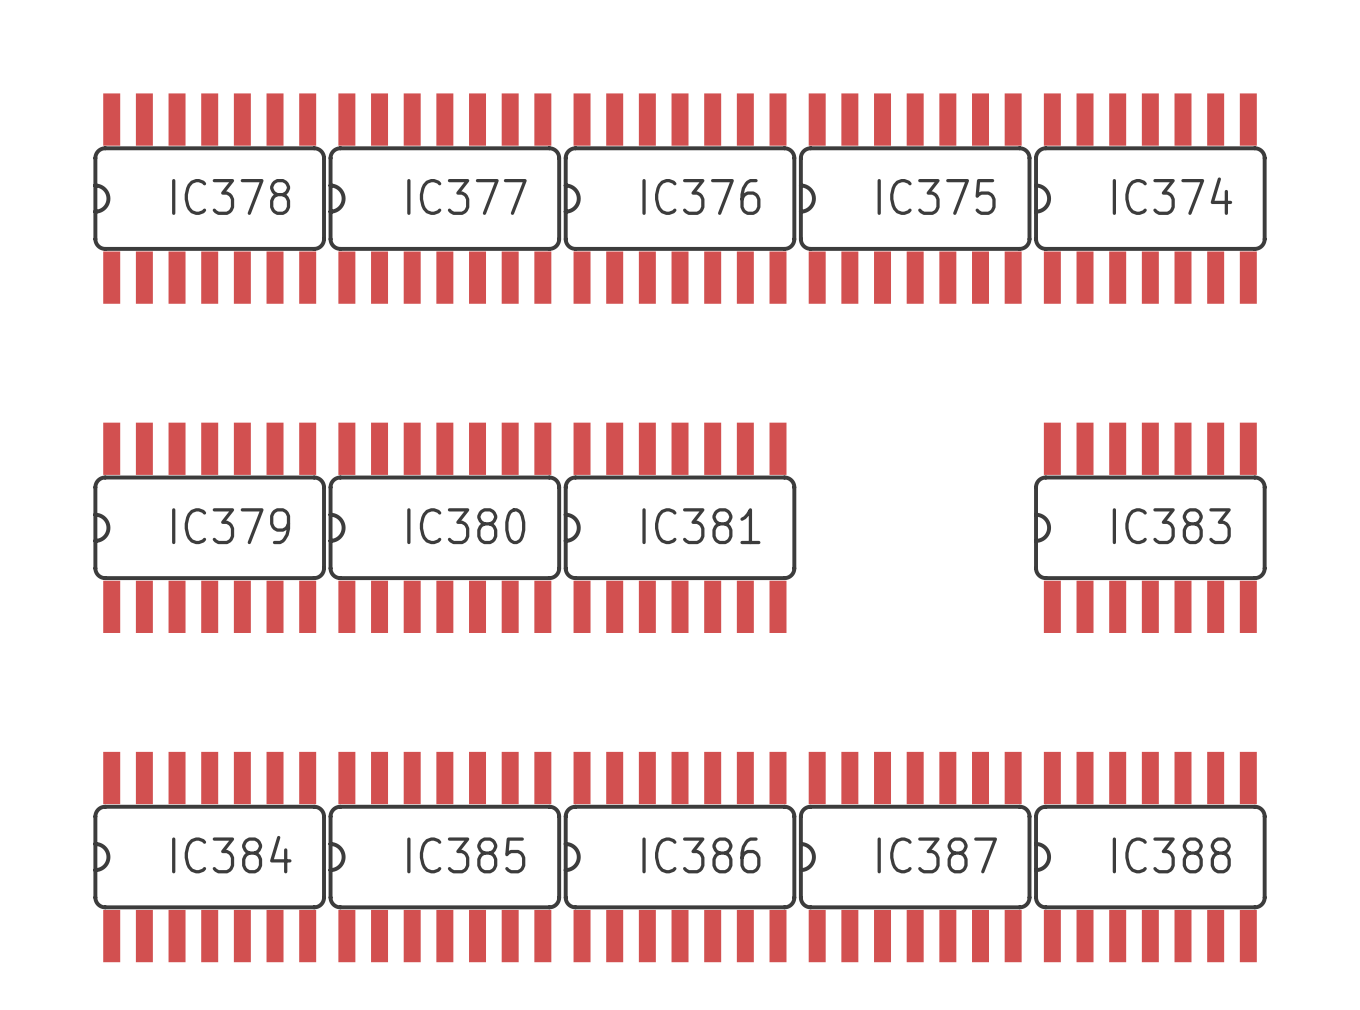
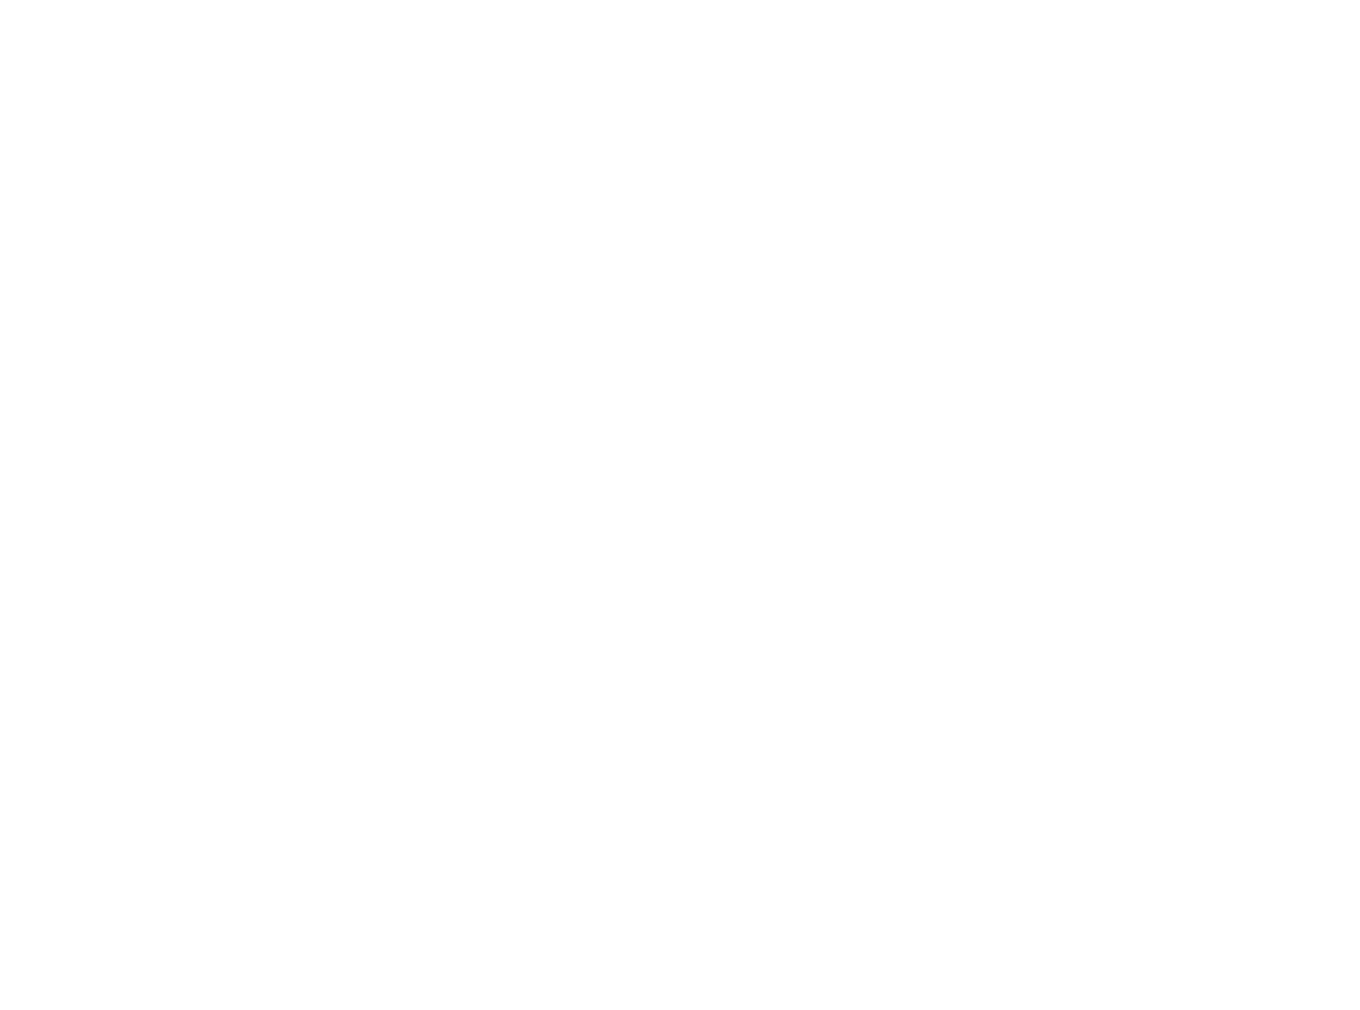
IC378: (209, 198) -> none
IC377: (444, 198) -> none
IC376: (680, 198) -> none
IC375: (915, 198) -> none
IC374: (1150, 198) -> none
IC379: (209, 527) -> none
IC380: (444, 527) -> none
IC381: (680, 527) -> none
IC383: (1150, 527) -> none
IC384: (209, 857) -> none
IC385: (444, 857) -> none
IC386: (680, 857) -> none
IC387: (915, 857) -> none
IC388: (1150, 857) -> none

